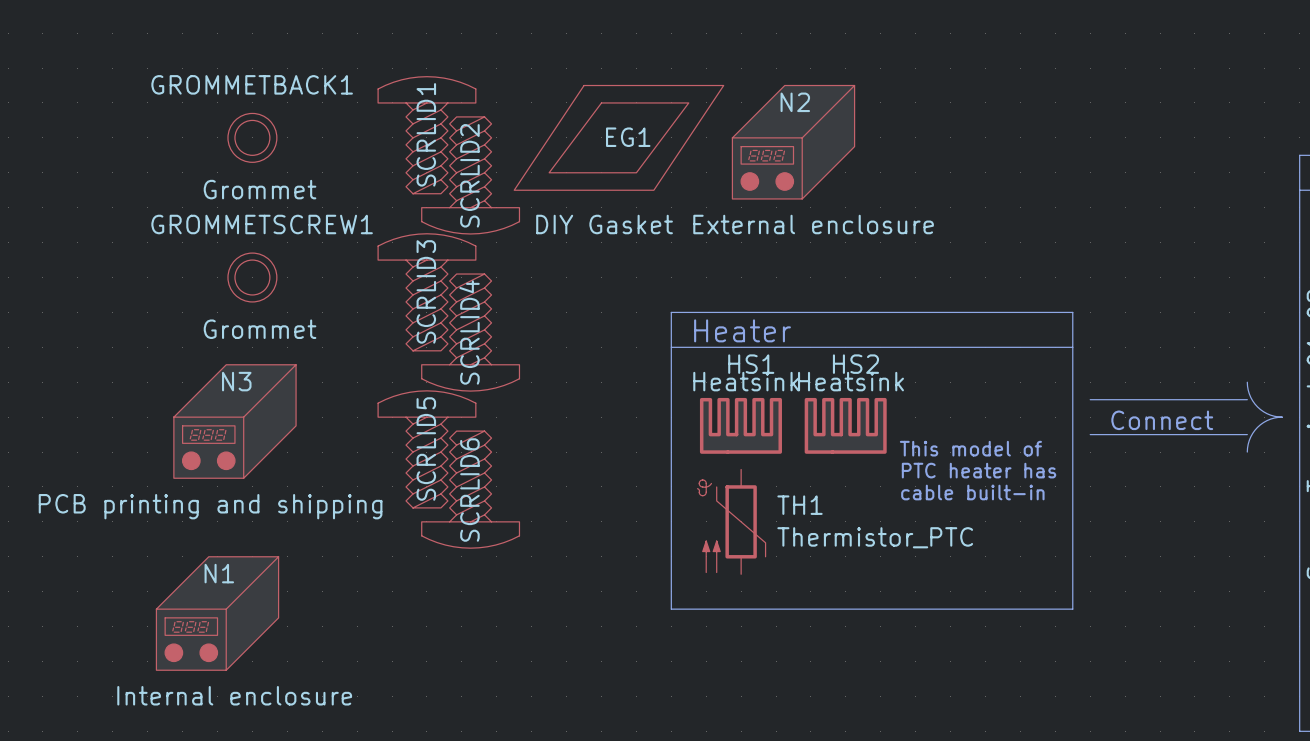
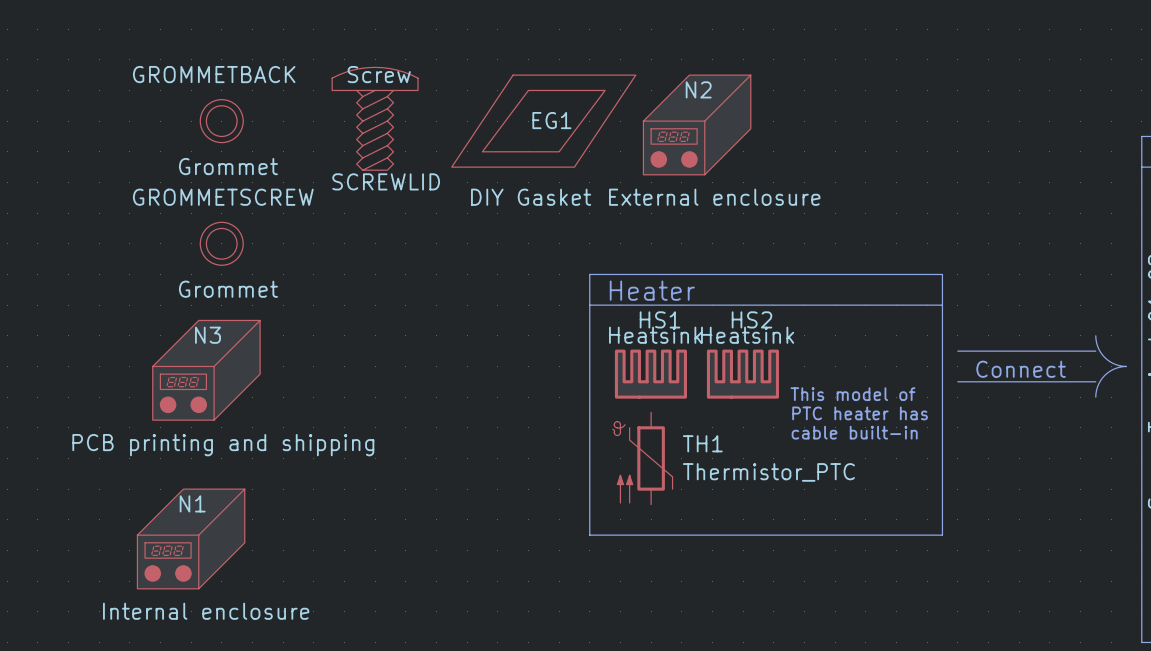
GROMMETBACK1 name: GROMMETBACK1 (252, 84) -> GROMMETBACK (214, 74)
SCRLID1 value: none -> Screw (379, 74)
SCRLID1 name: SCRLID1 (426, 134) -> SCREWLID (386, 181)
SCRLID2: (470, 175) -> none
GROMMETSCREW1 name: GROMMETSCREW1 (262, 224) -> GROMMETSCREW (223, 197)
SCRLID3: (426, 292) -> none
SCRLID4: (470, 332) -> none
SCRLID5: (426, 449) -> none
SCRLID6: (470, 489) -> none
N3 value position: PCB printing and shipping (210, 506) -> PCB printing and shipping (223, 445)

